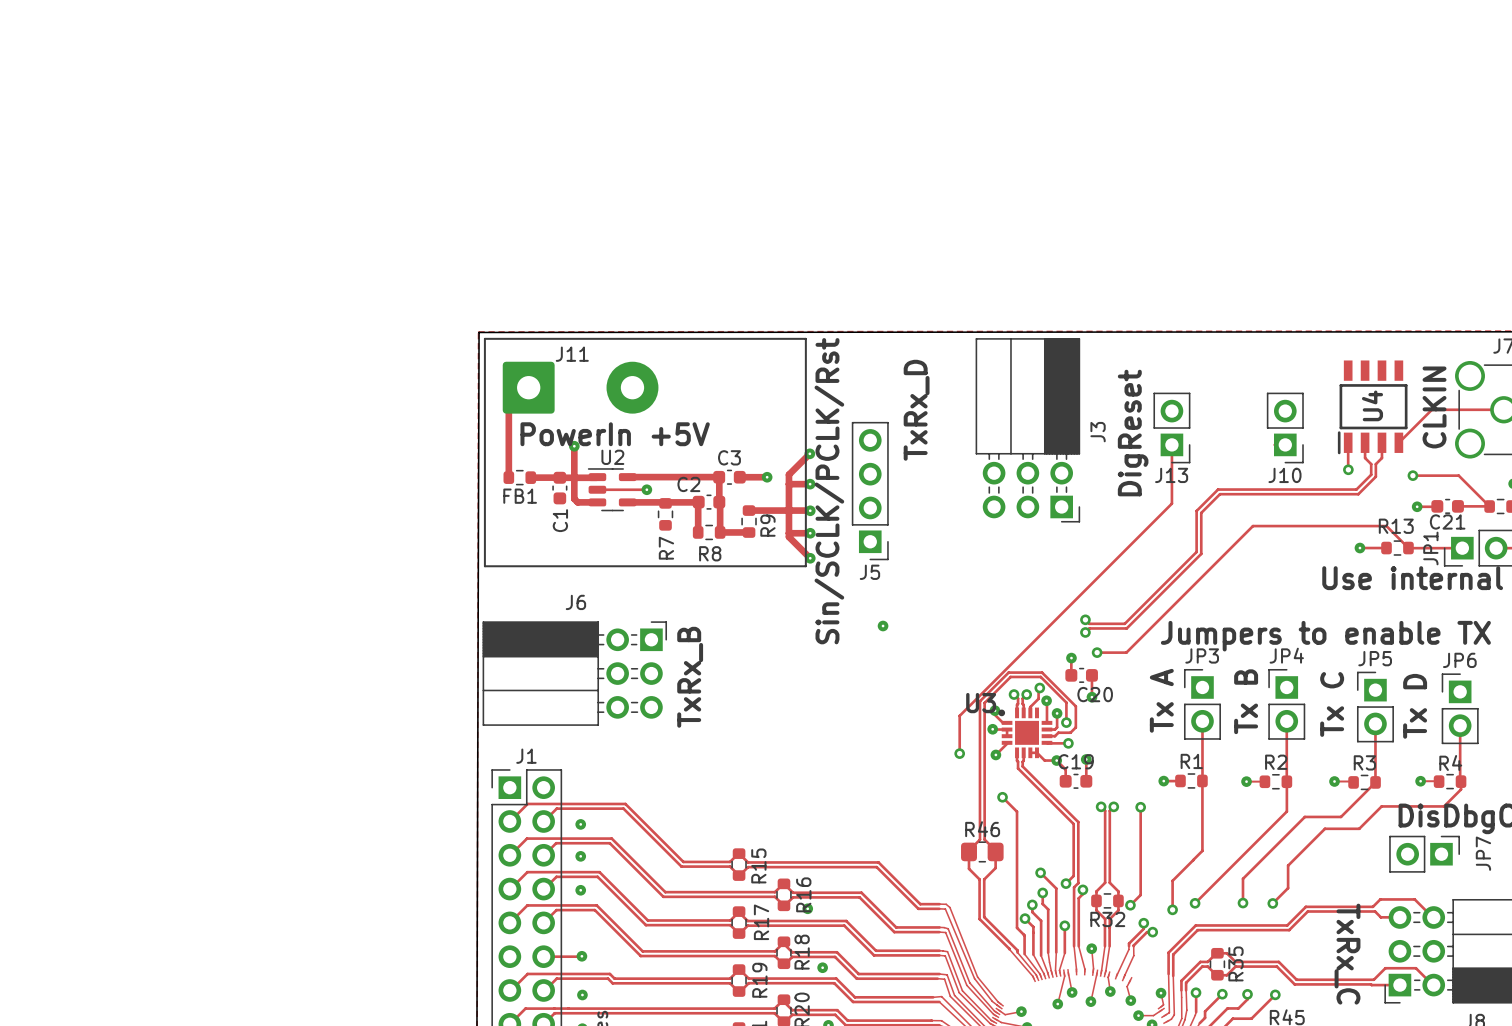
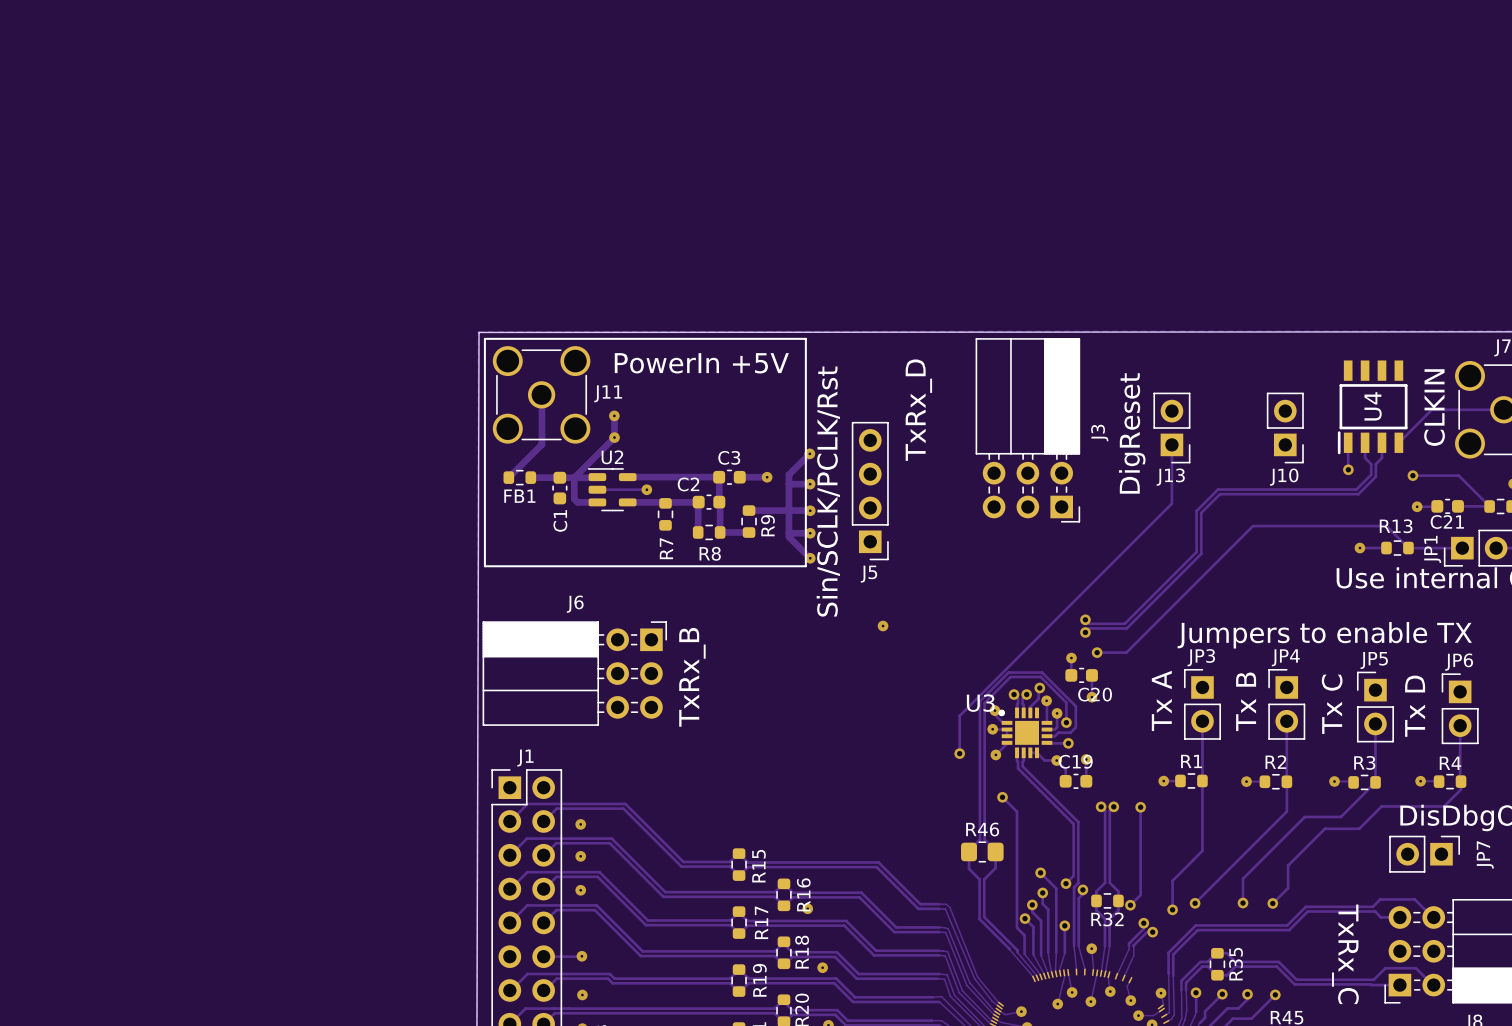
J11 name position: J11 (572, 354) -> J11 (608, 393)
J11 footprint: [502, 361, 659, 414] -> [492, 346, 591, 444]
track: (528, 387) (508, 407) (508, 477) -> (541, 394) (541, 444) (508, 477)
via: none -> (614, 415)
text position: PowerIn +5V (615, 434) -> PowerIn +5V (701, 363)
via: none -> (614, 437)
track: (574, 446) (574, 477) -> (614, 416) (614, 437) (574, 477)
via: (574, 446) -> none

